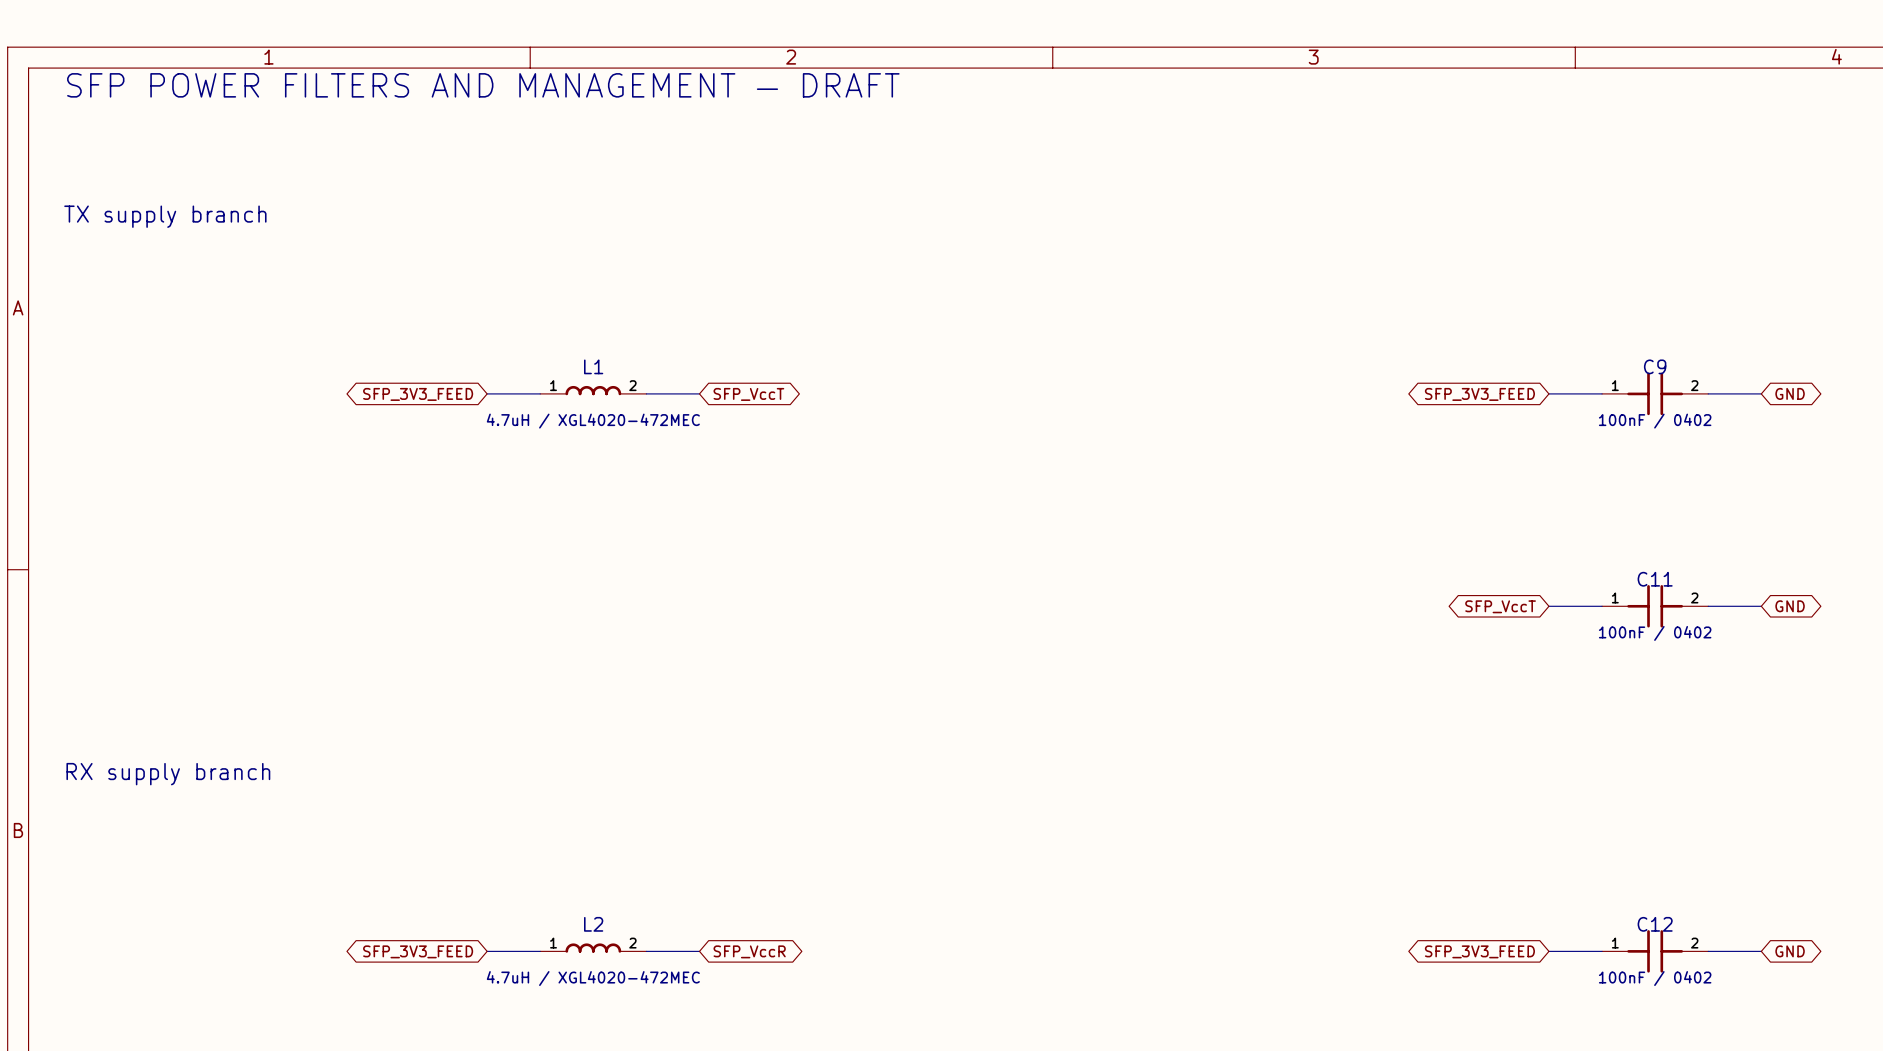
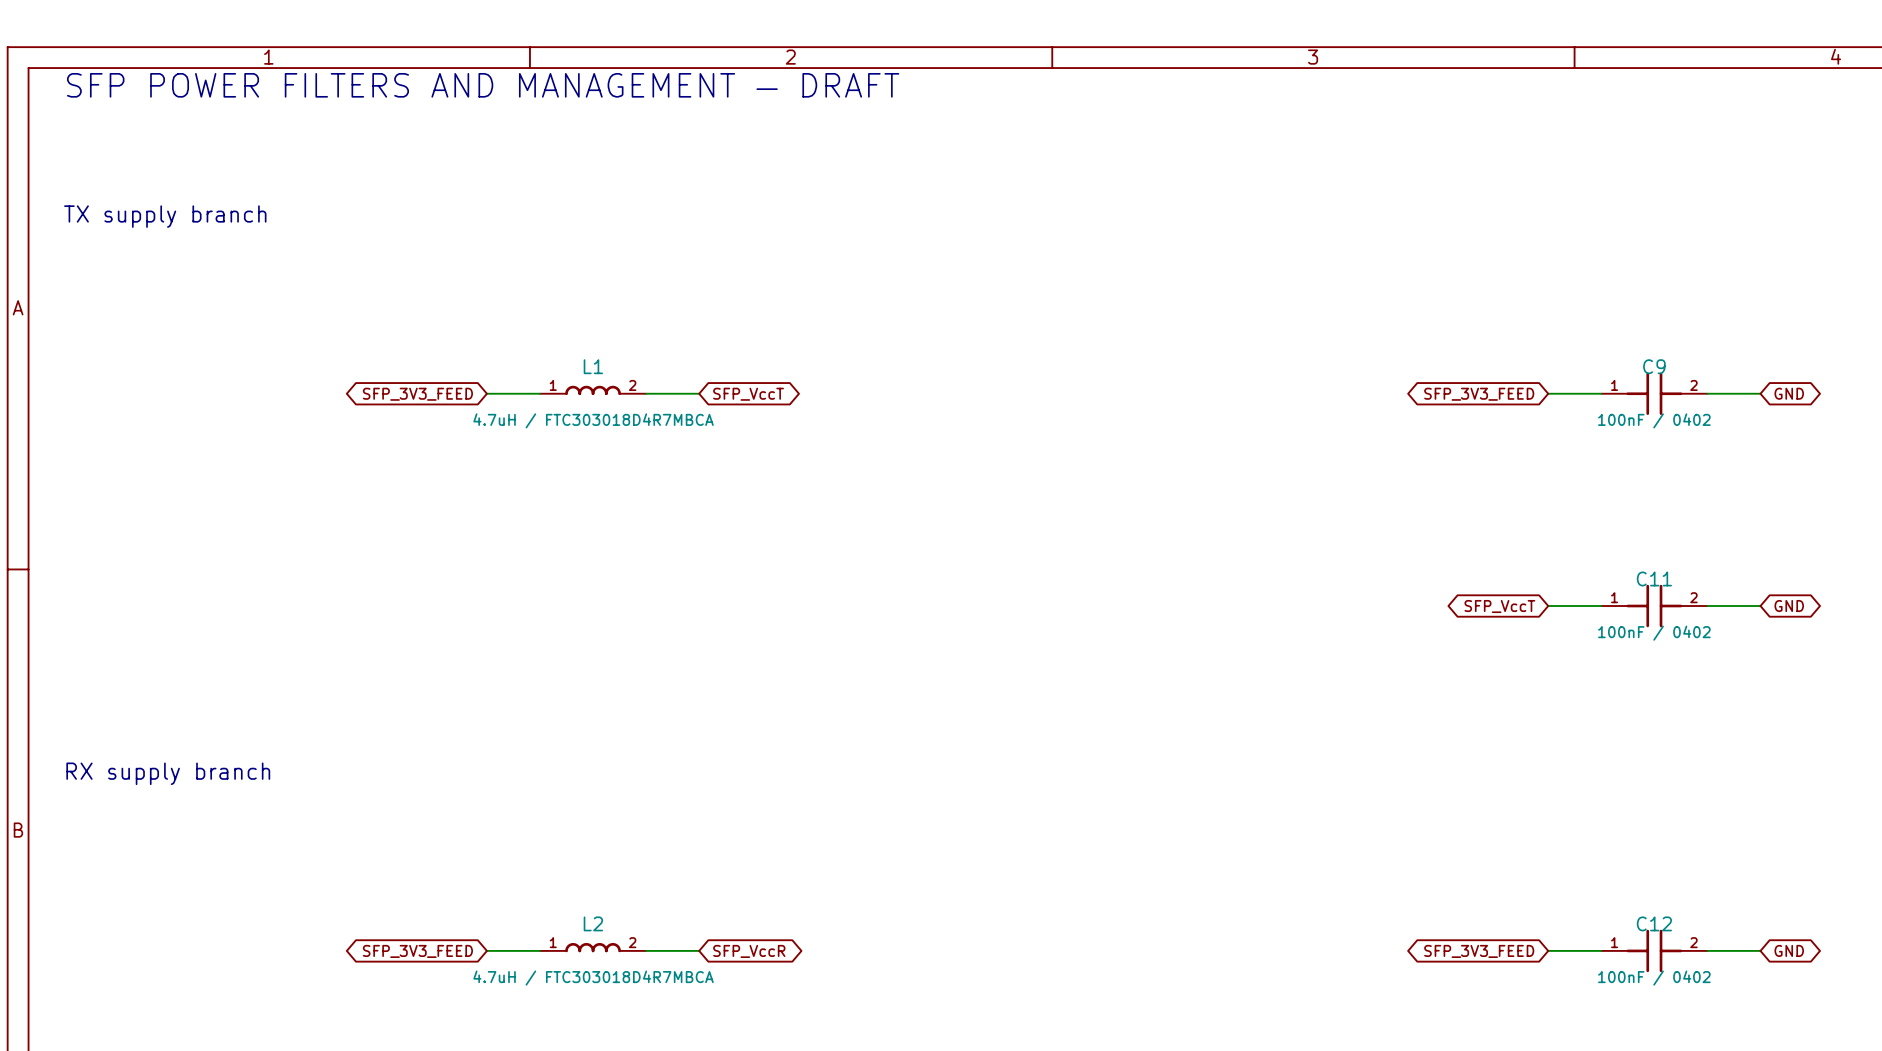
L1 value: 4.7uH / XGL4020-472MEC (593, 421) -> 4.7uH / FTC303018D4R7MBCA (593, 420)
L2 value: 4.7uH / XGL4020-472MEC (593, 978) -> 4.7uH / FTC303018D4R7MBCA (593, 978)

